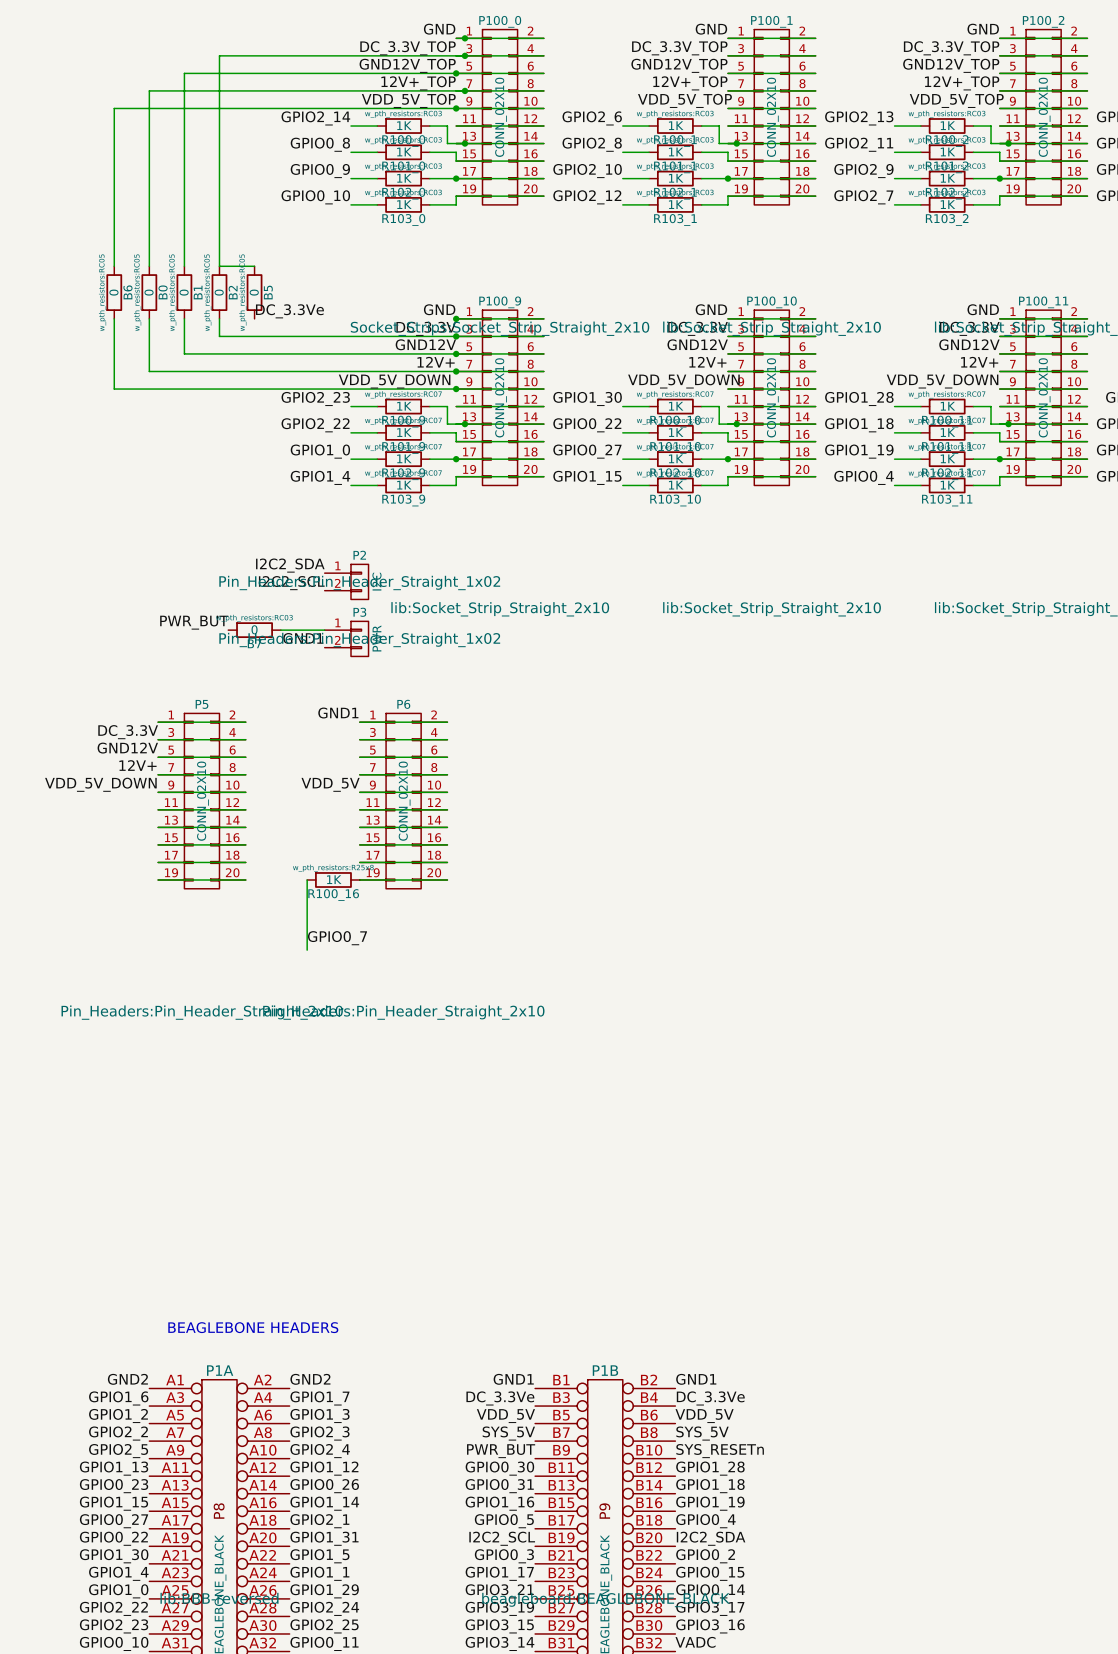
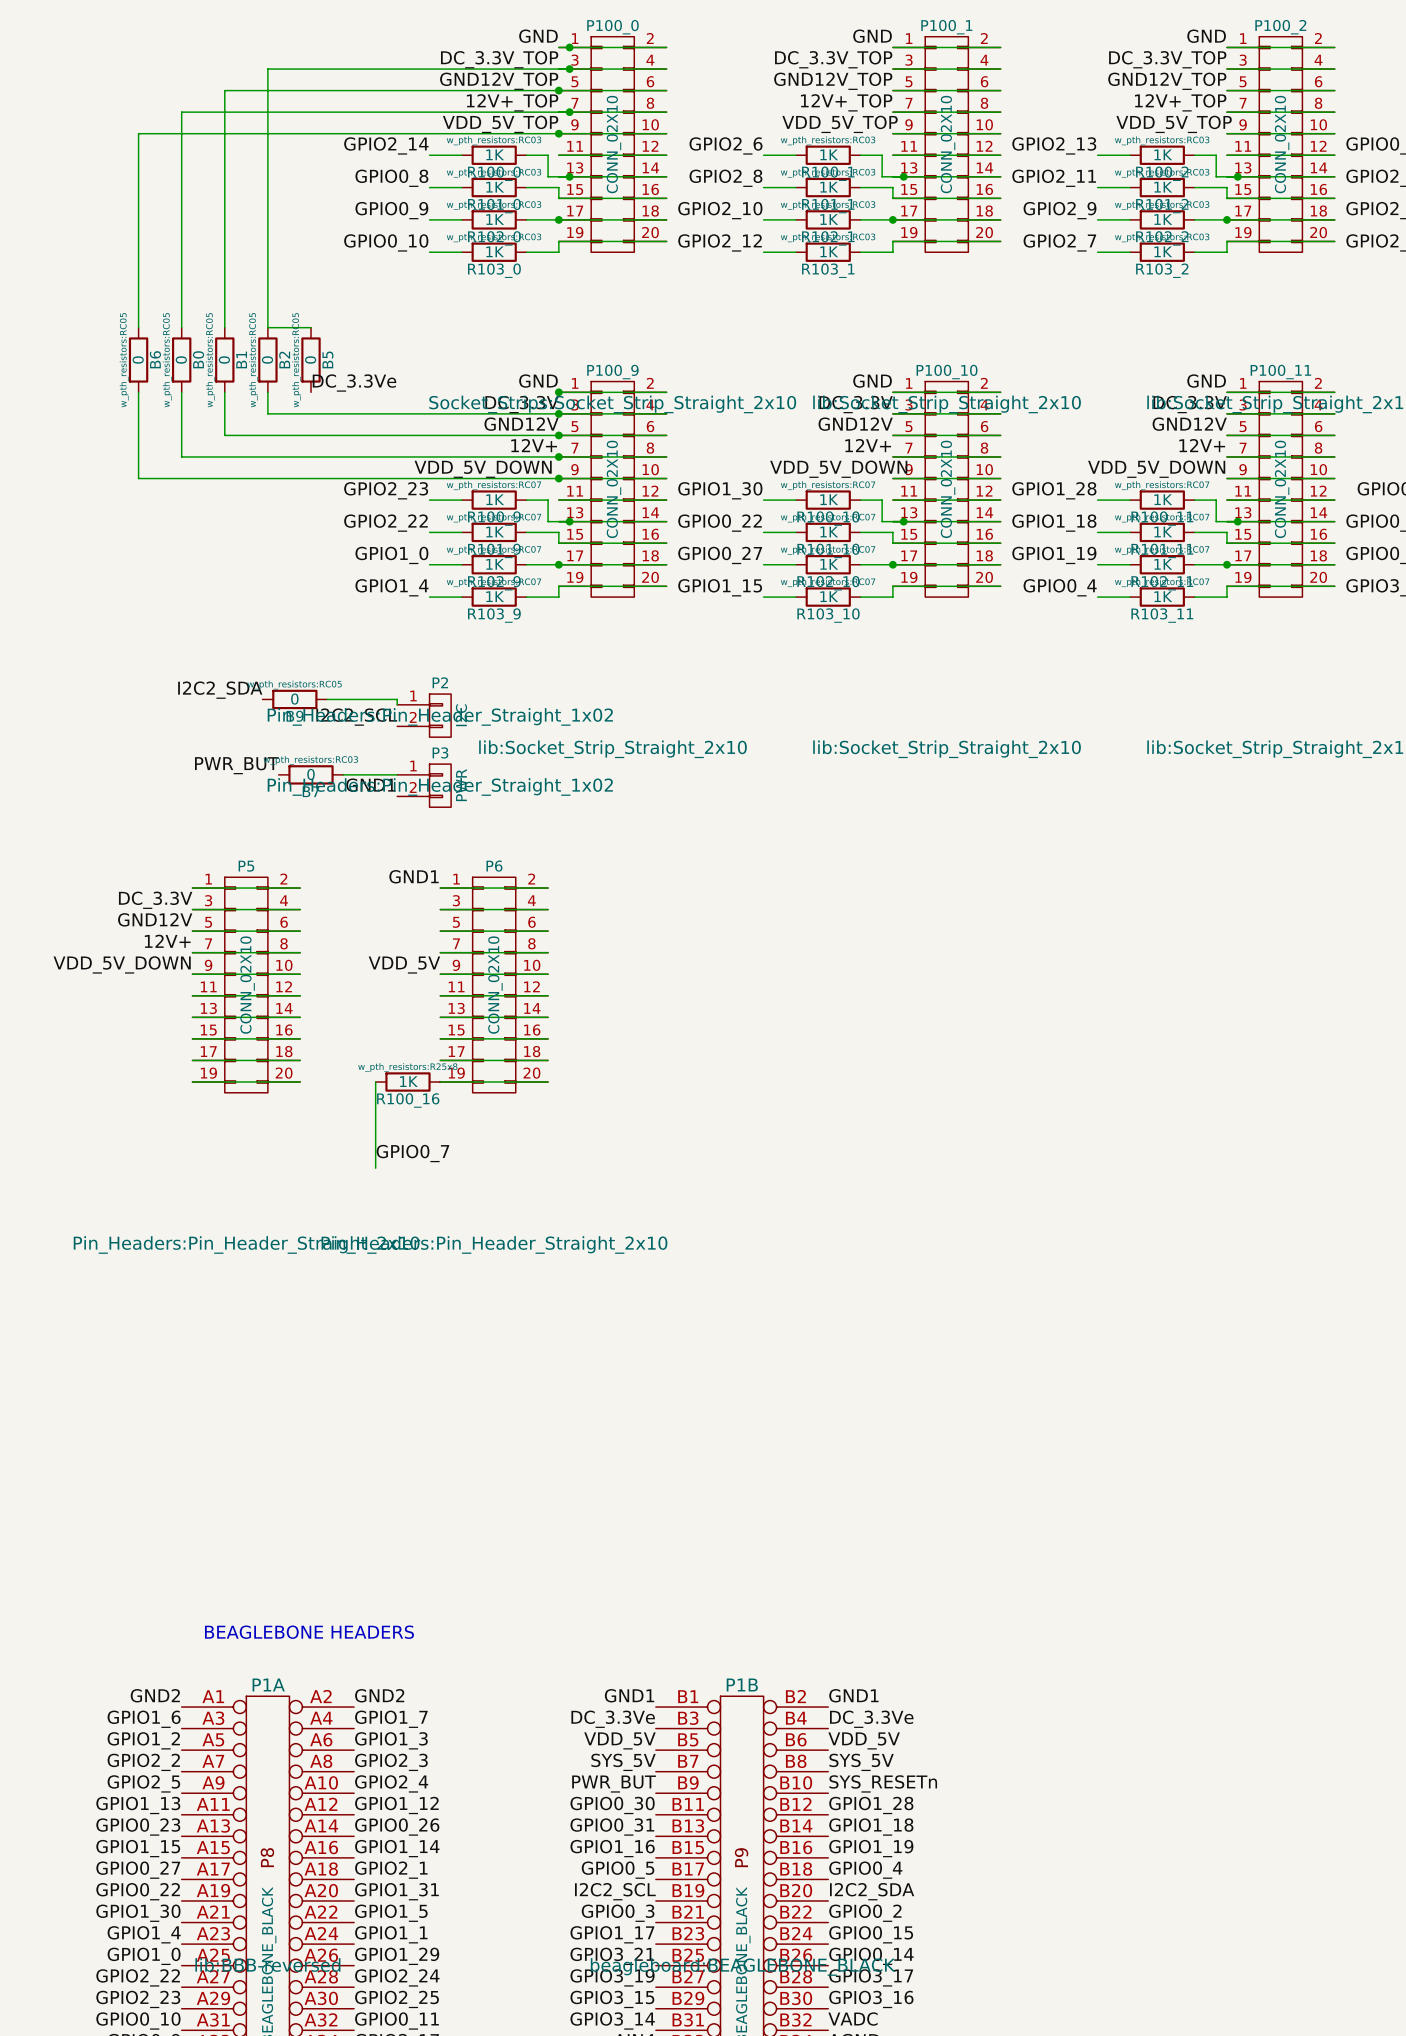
label position: I2C2_SDA (290, 565) -> I2C2_SDA (220, 690)
B9: none -> 0 (294, 699)
wire: none -> (327, 699) (397, 699) (397, 704)

